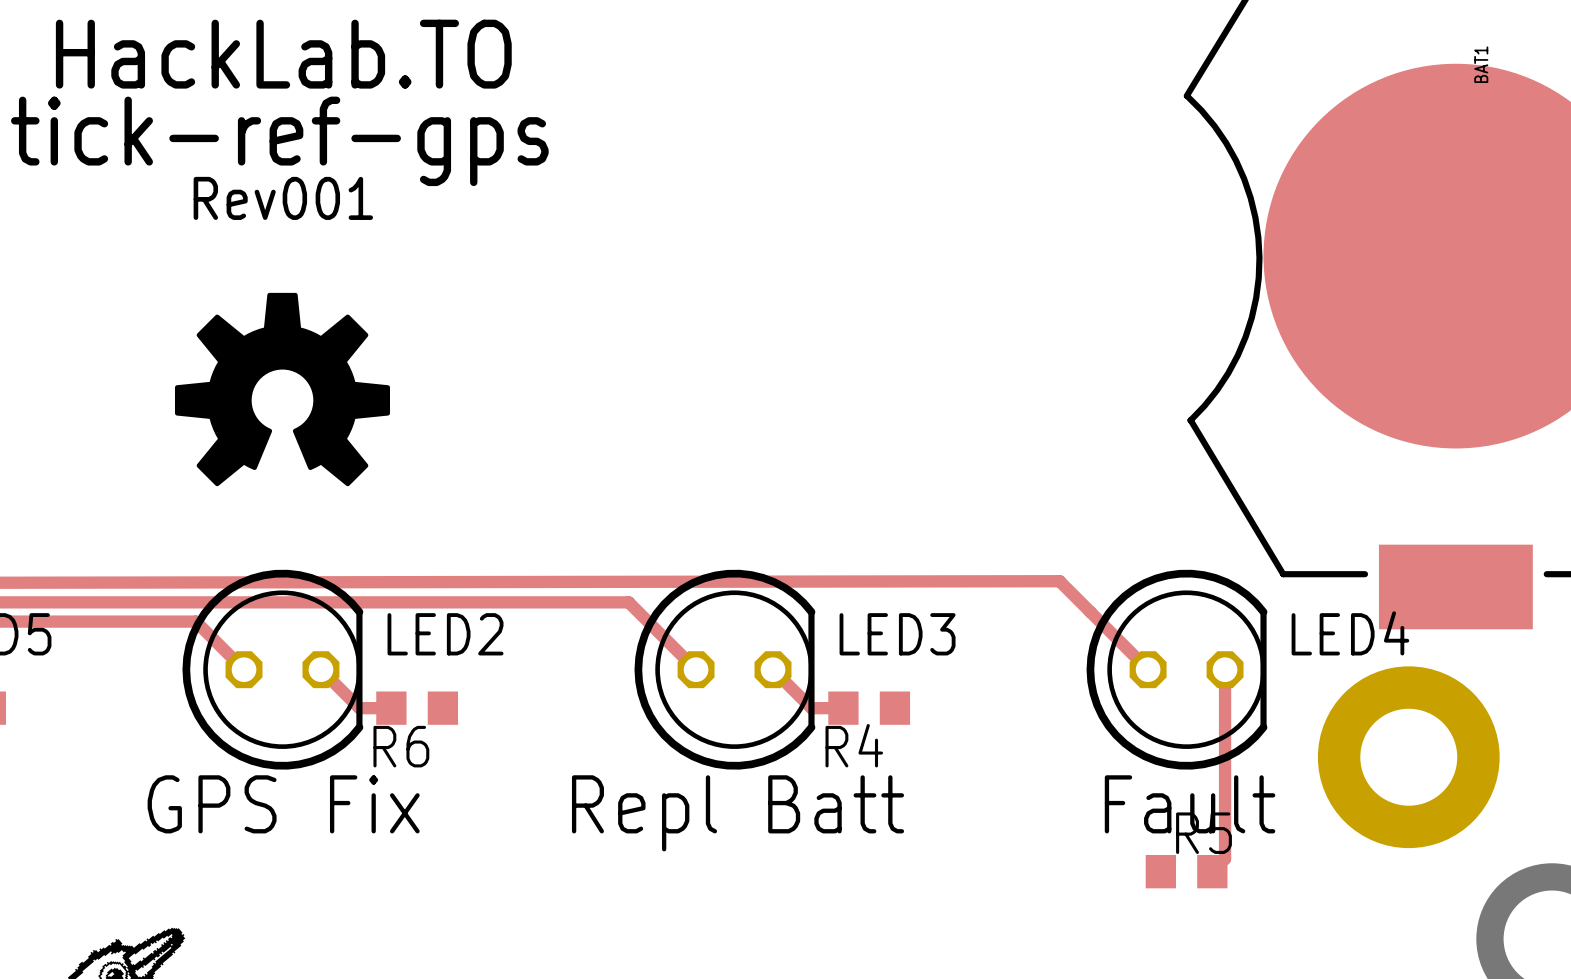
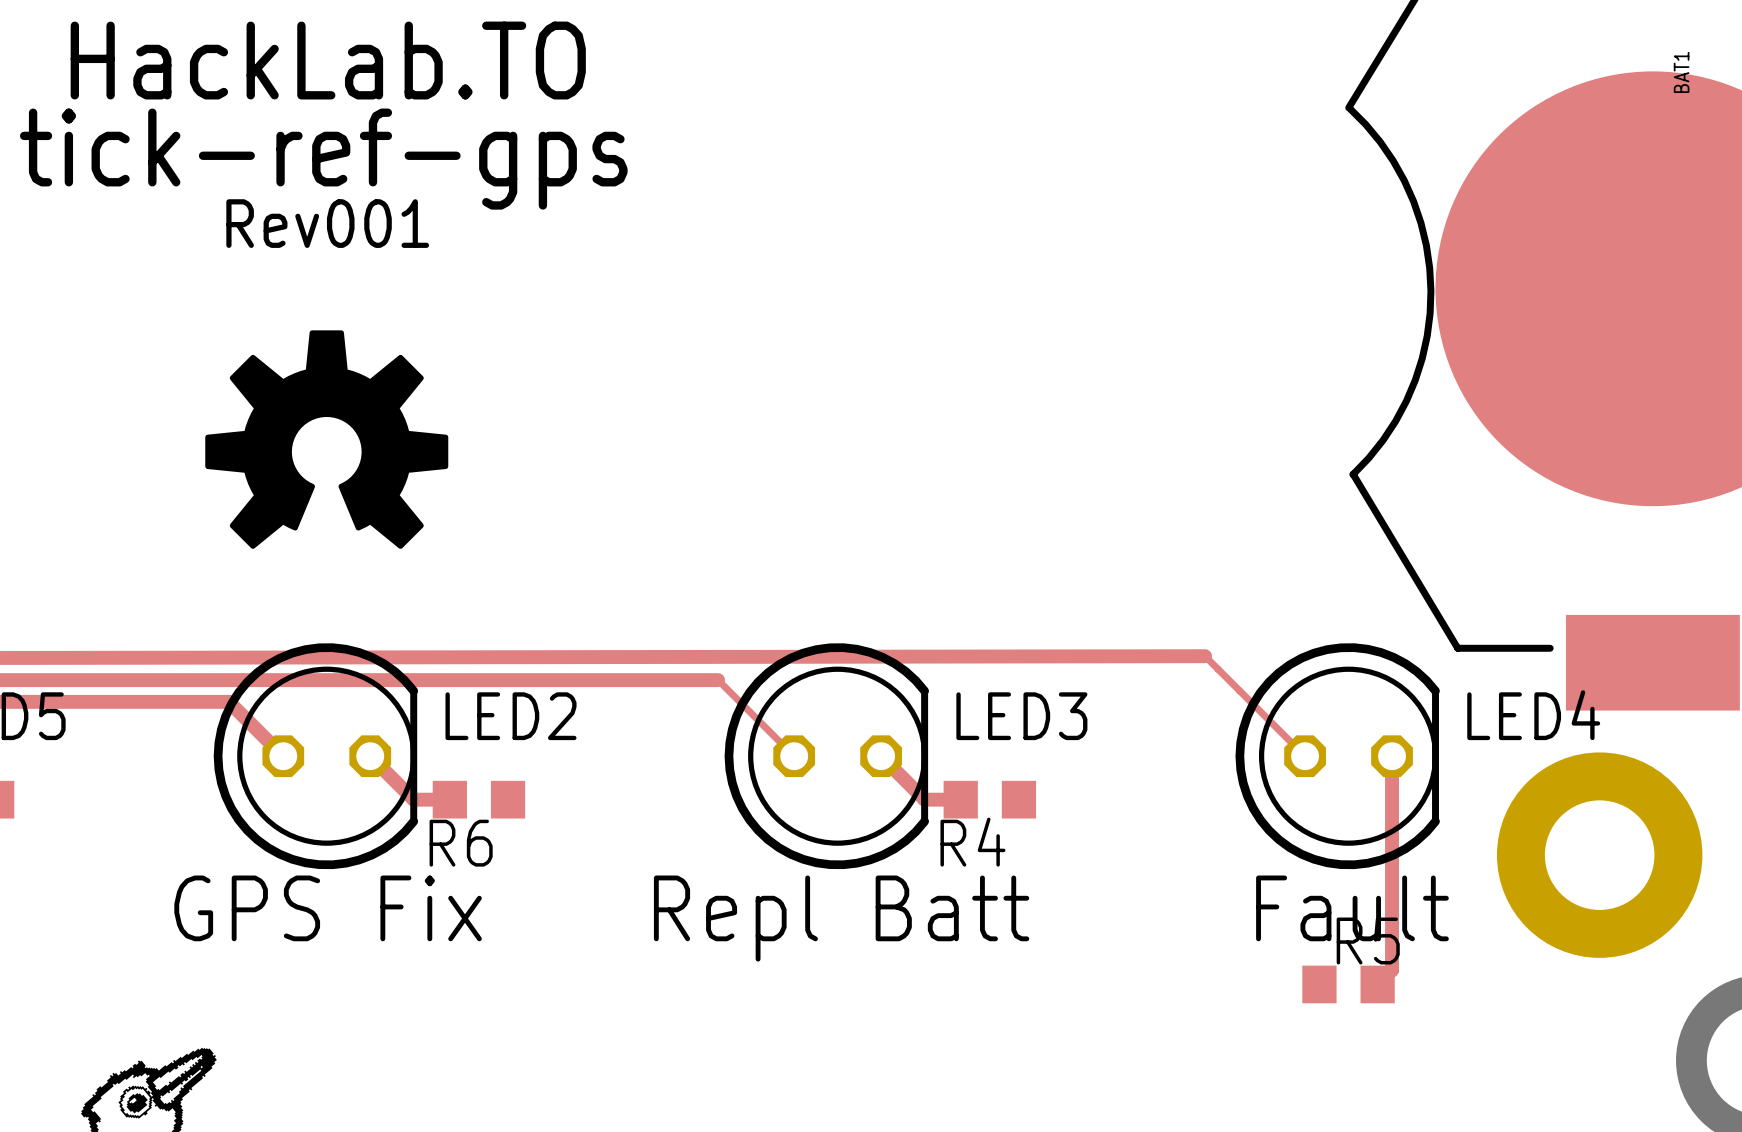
top track width: thick (1059, 581) (1148, 669) -> thin (1205, 656) (1305, 756)
top track width: thick (628, 602) (696, 669) -> thin (718, 680) (794, 756)

